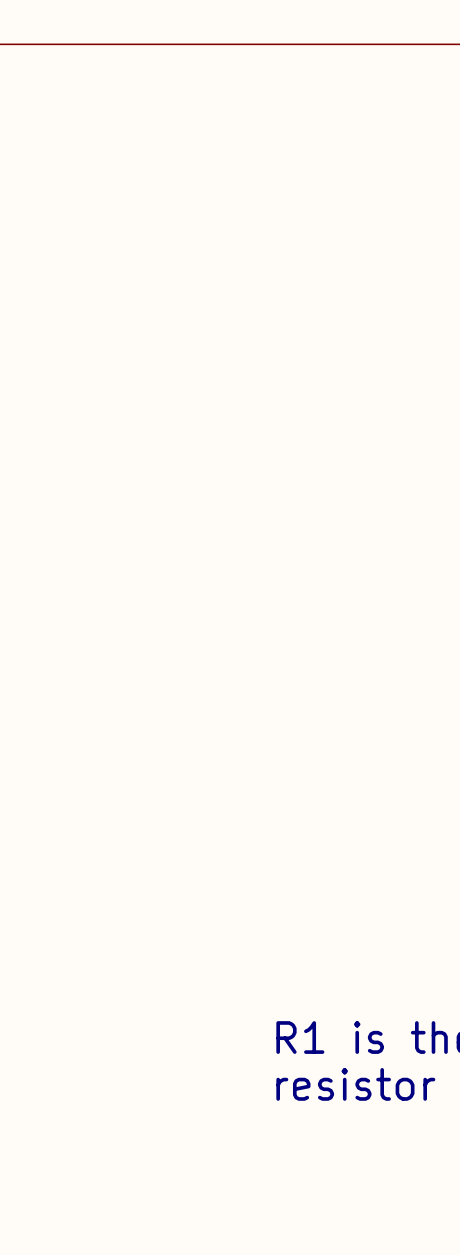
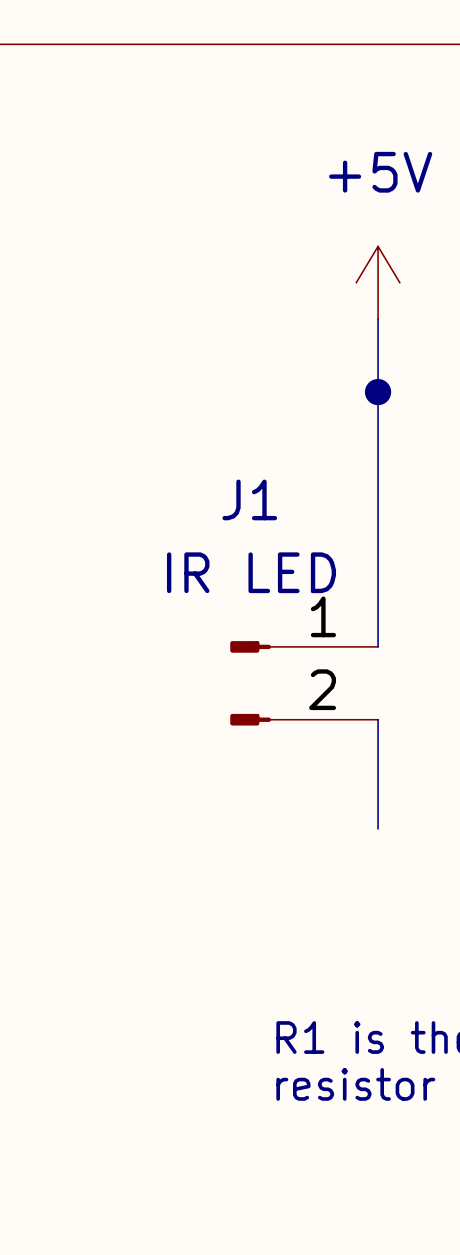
power symbol: none -> +5V (378, 282)
wire: none -> (378, 319) (378, 646)
junction: none -> (378, 392)
J1: none -> IR LED (304, 683)
wire: none -> (378, 719) (378, 828)

